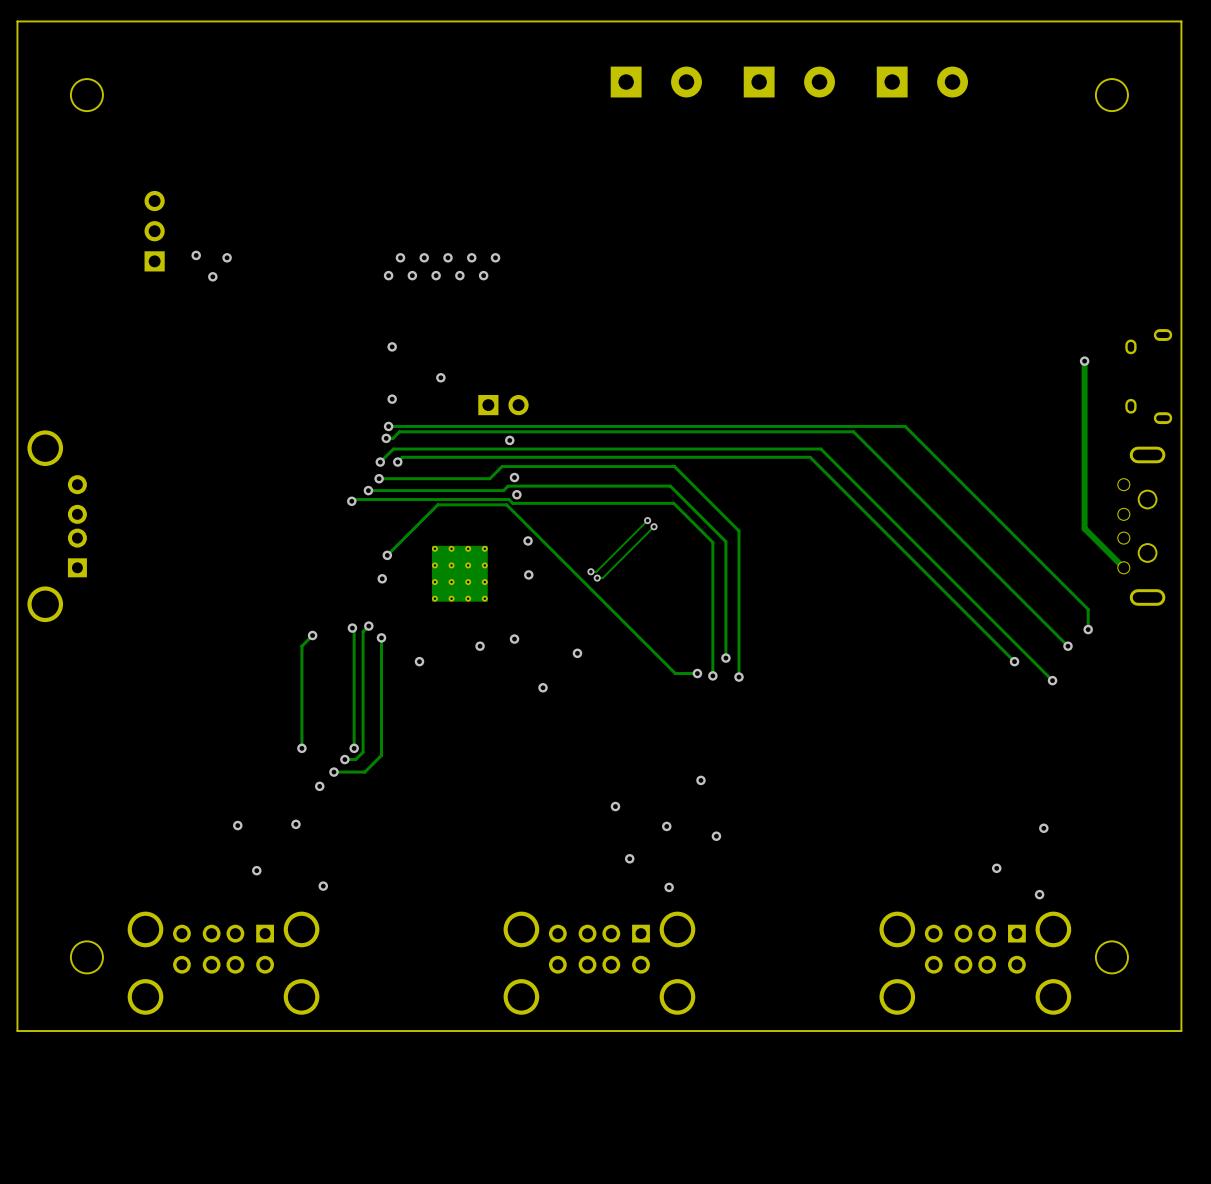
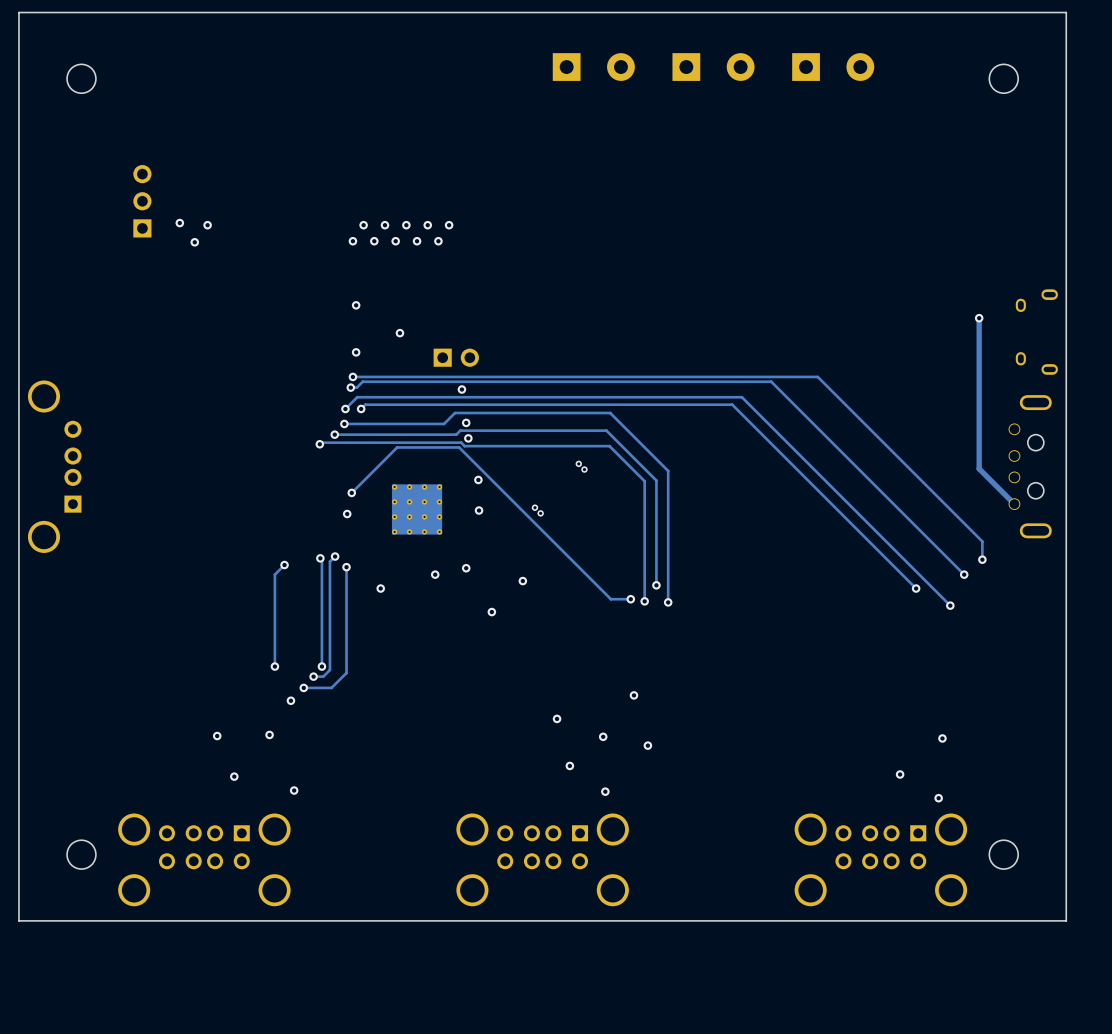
track: (647, 520) (596, 571) (590, 571) -> none
via: (647, 520) -> none
via: none -> (578, 463)
track: (654, 526) (602, 578) (597, 578) -> none
via: (654, 526) -> none
via: none -> (584, 469)

